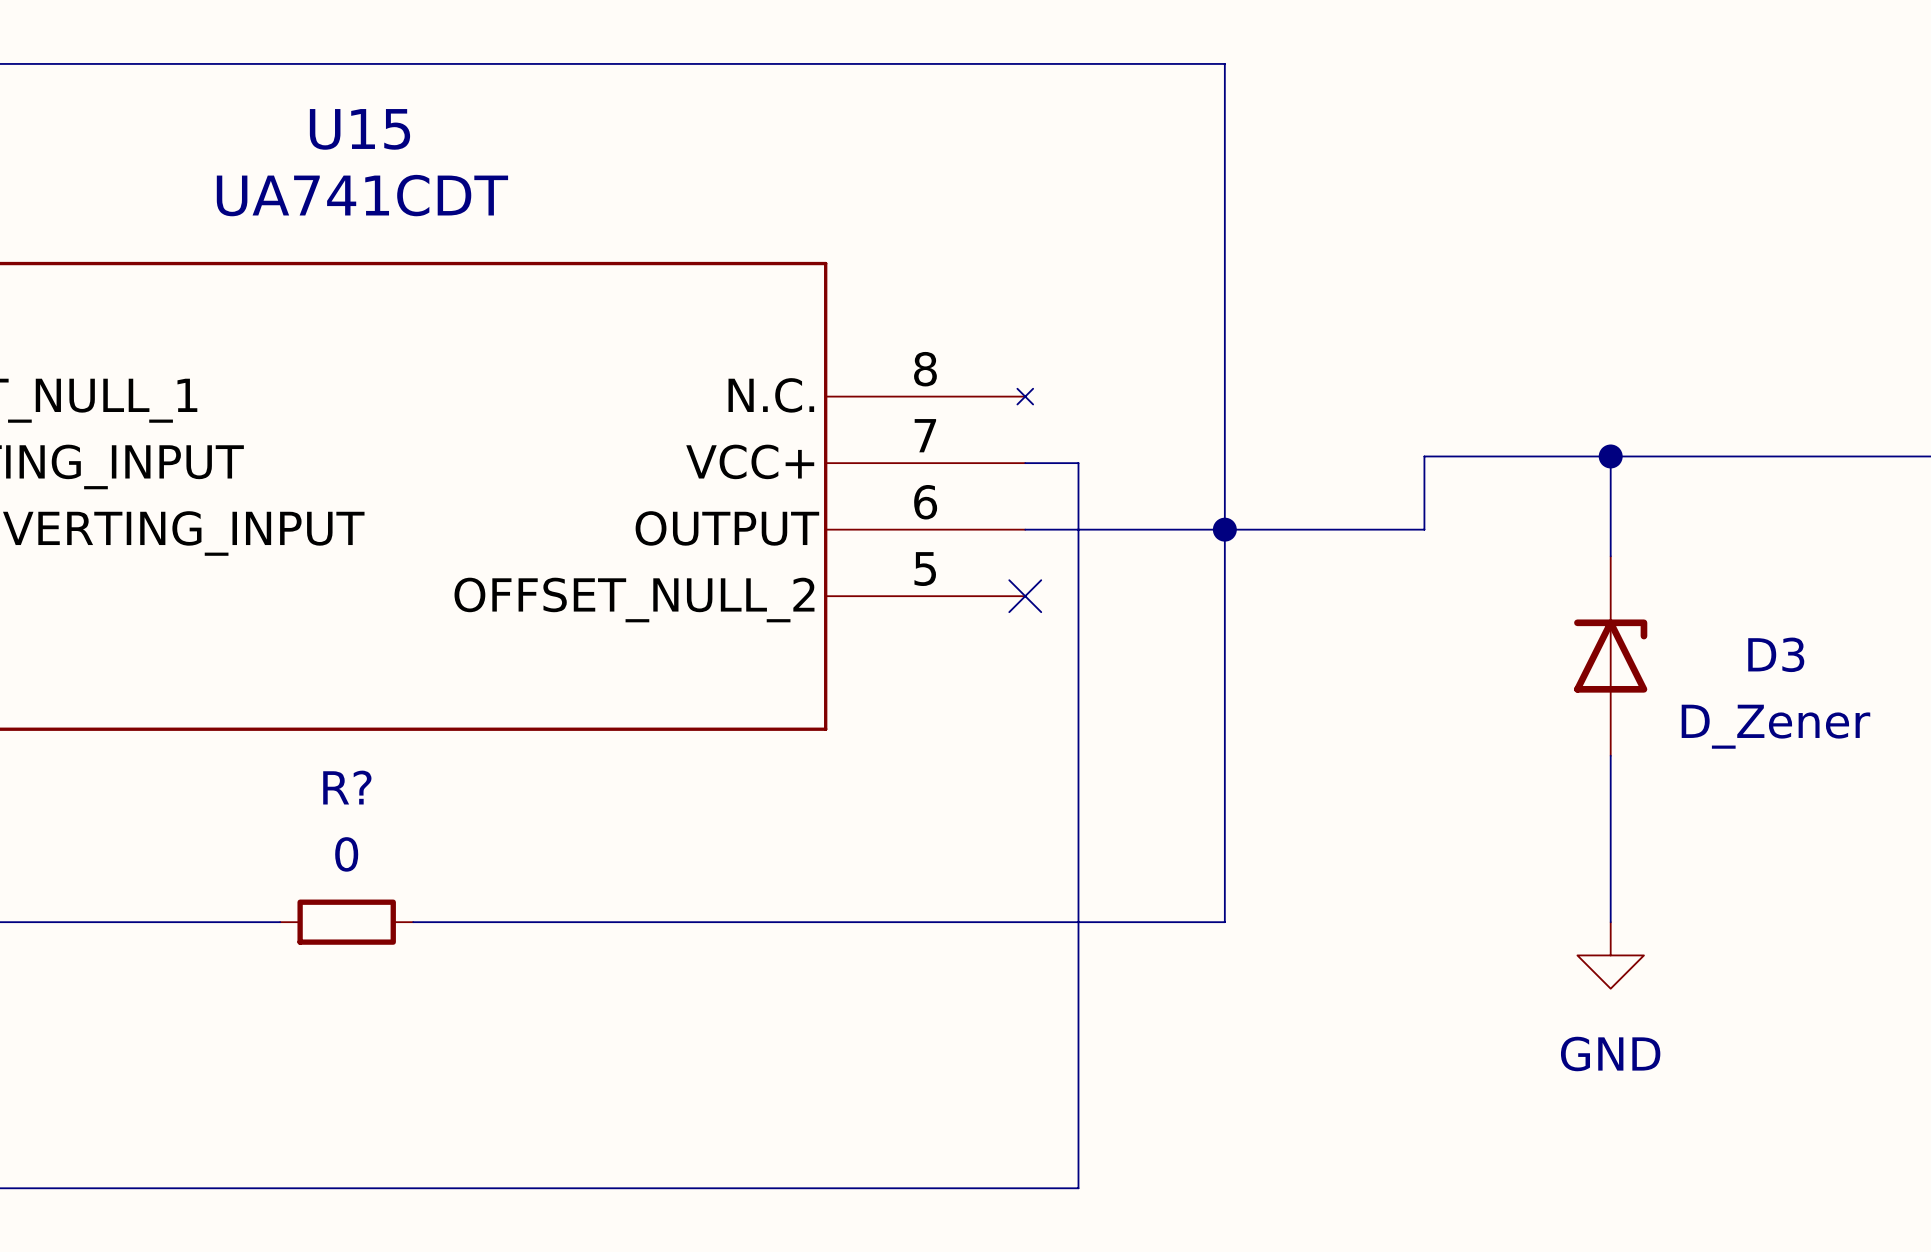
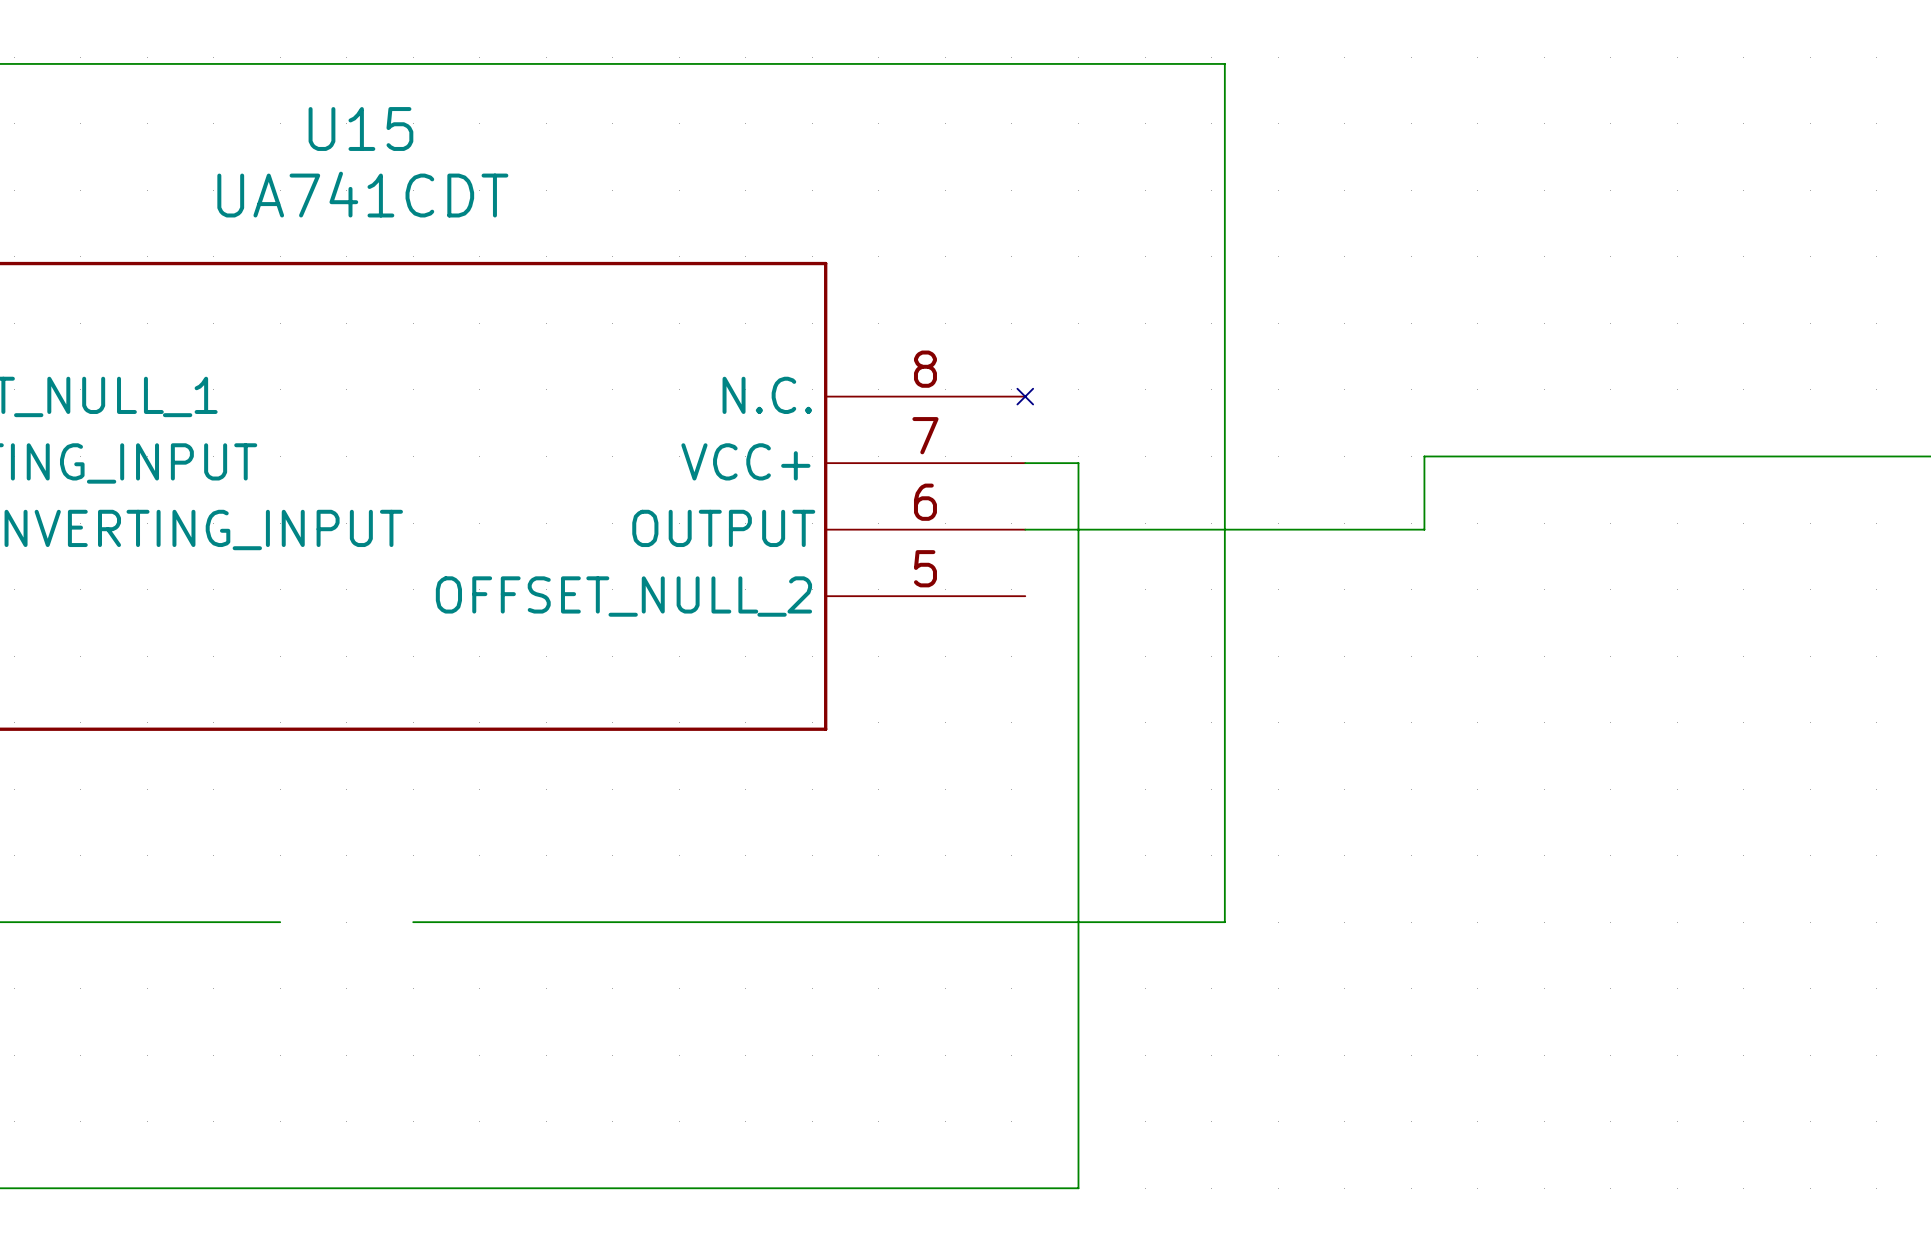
wire: (1610, 456) (1610, 556) -> none
junction: (1610, 456) -> none
junction: (1224, 529) -> none
no-connect mark: (1025, 596) -> none
D3: D_Zener (1610, 656) -> none
wire: (1610, 755) (1610, 922) -> none
R?: 0 (346, 922) -> none
power symbol: GND (1610, 955) -> none

